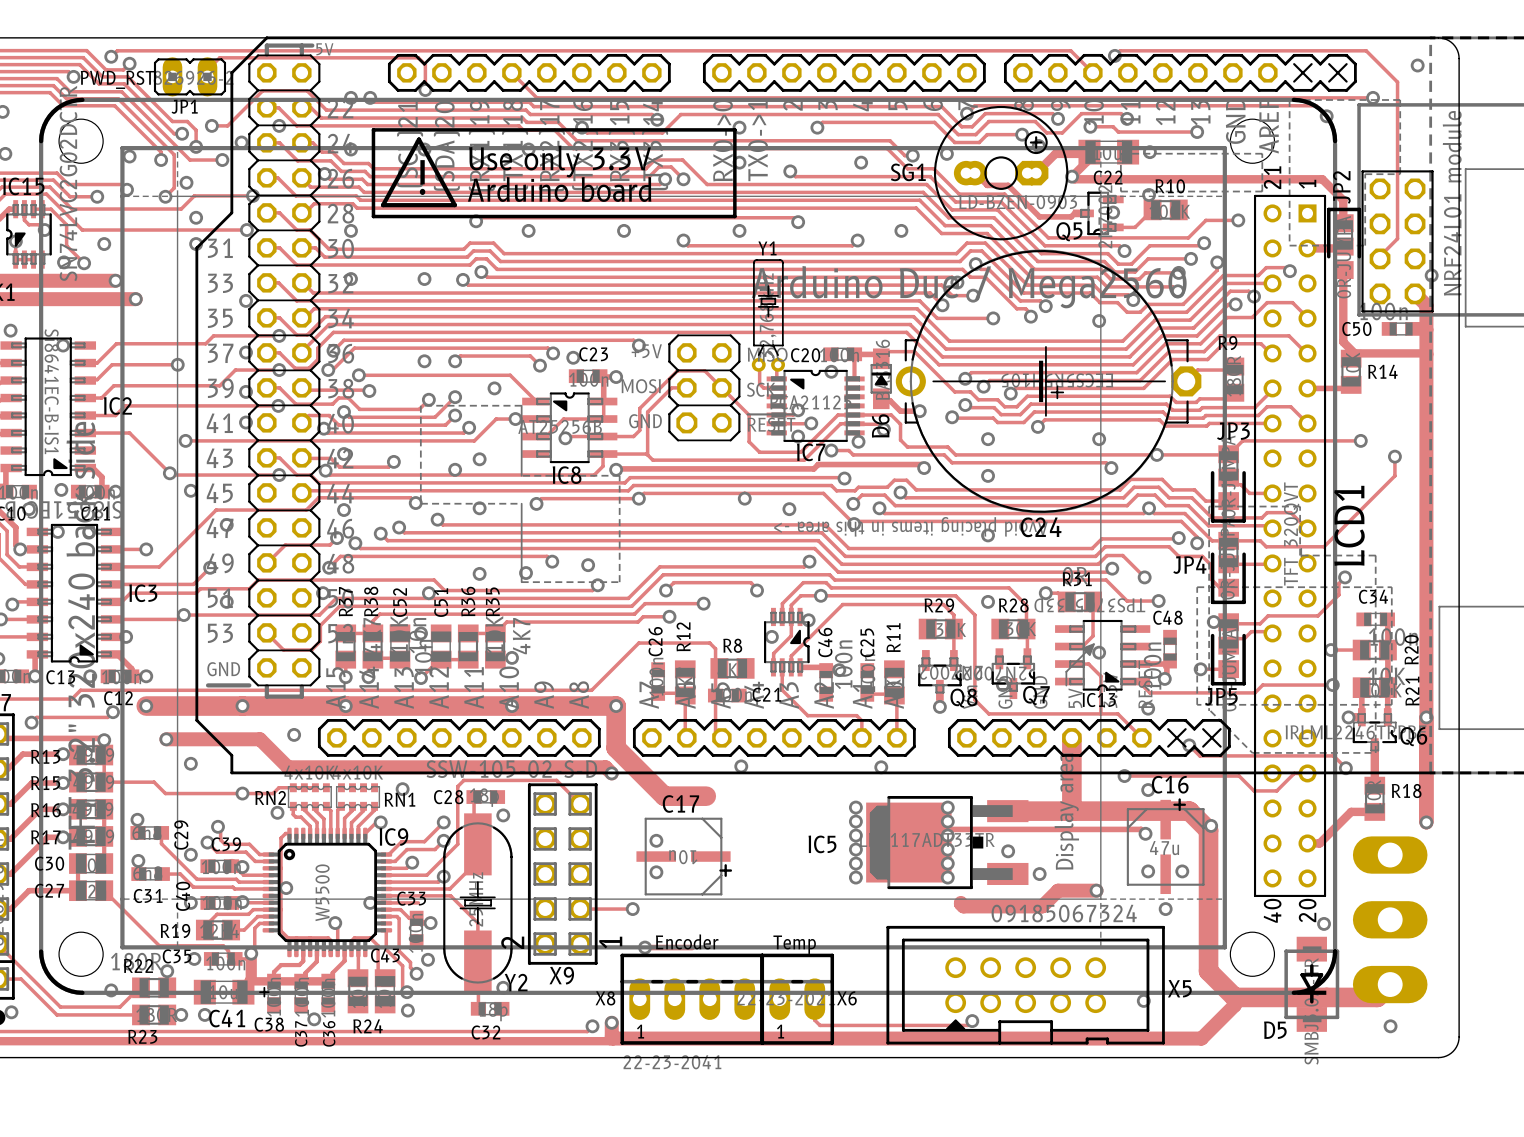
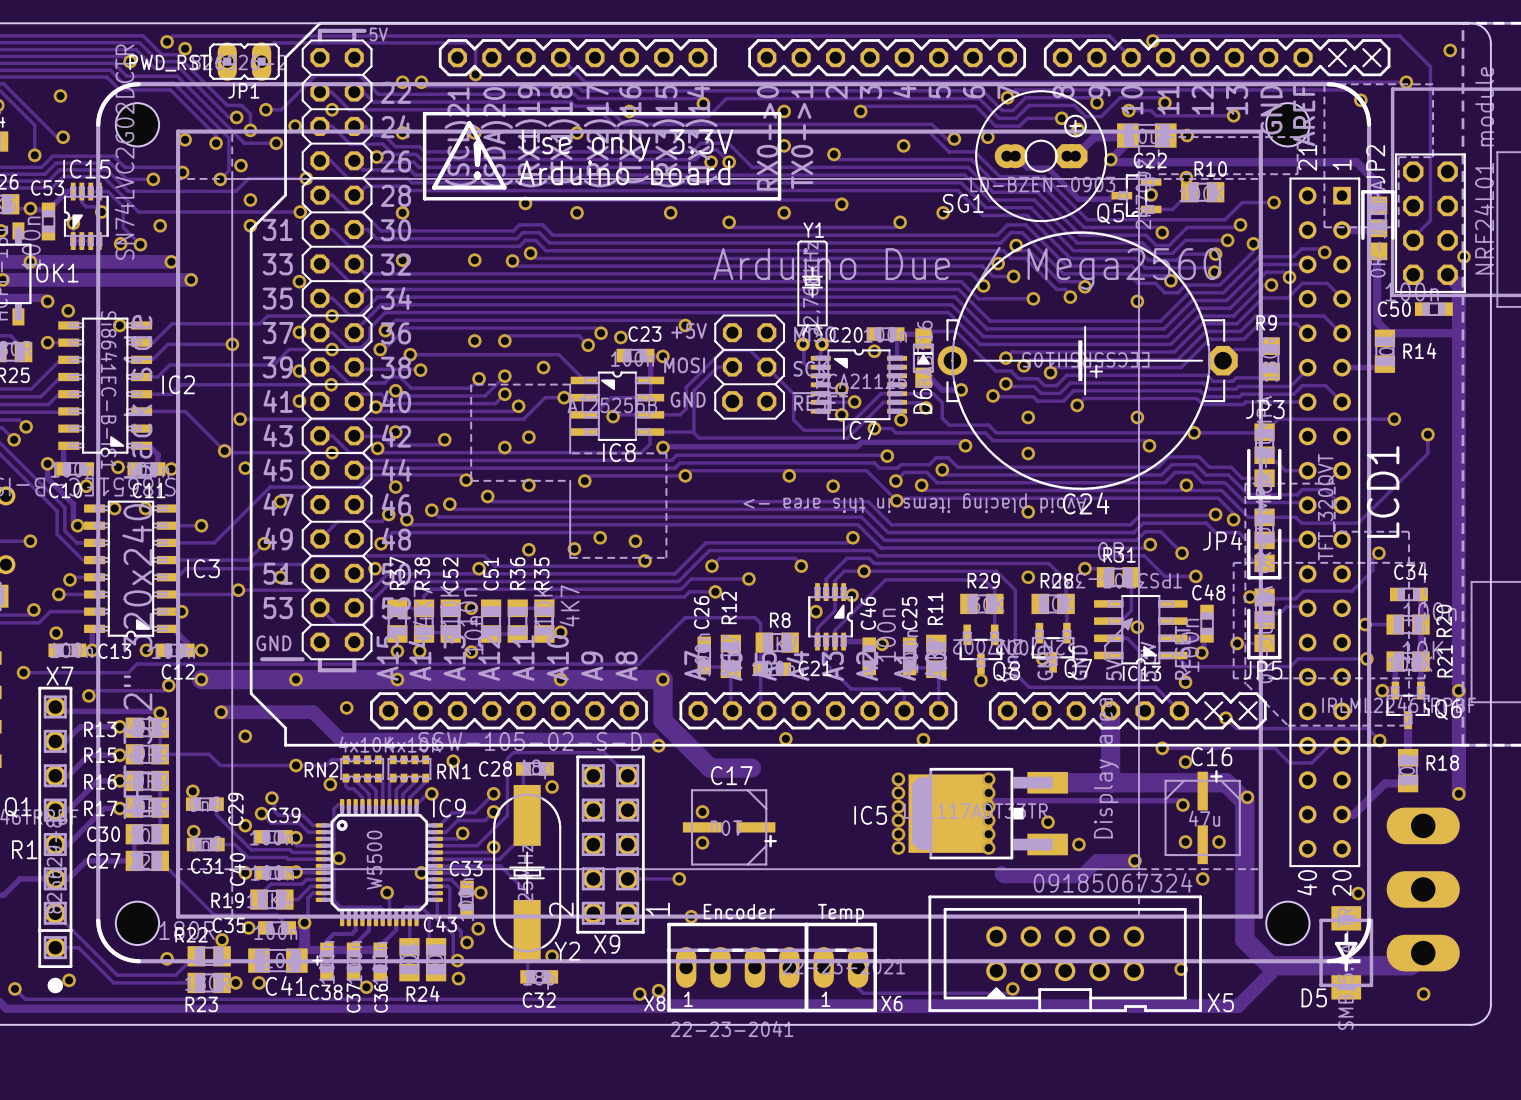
SG1 name position: SG1 (908, 172) -> SG1 (963, 203)
X5 name position: X5 (1179, 988) -> X5 (1220, 1002)
X8 name position: X8 (605, 998) -> X8 (654, 1003)
X6 name position: X6 (846, 998) -> X6 (891, 1003)

